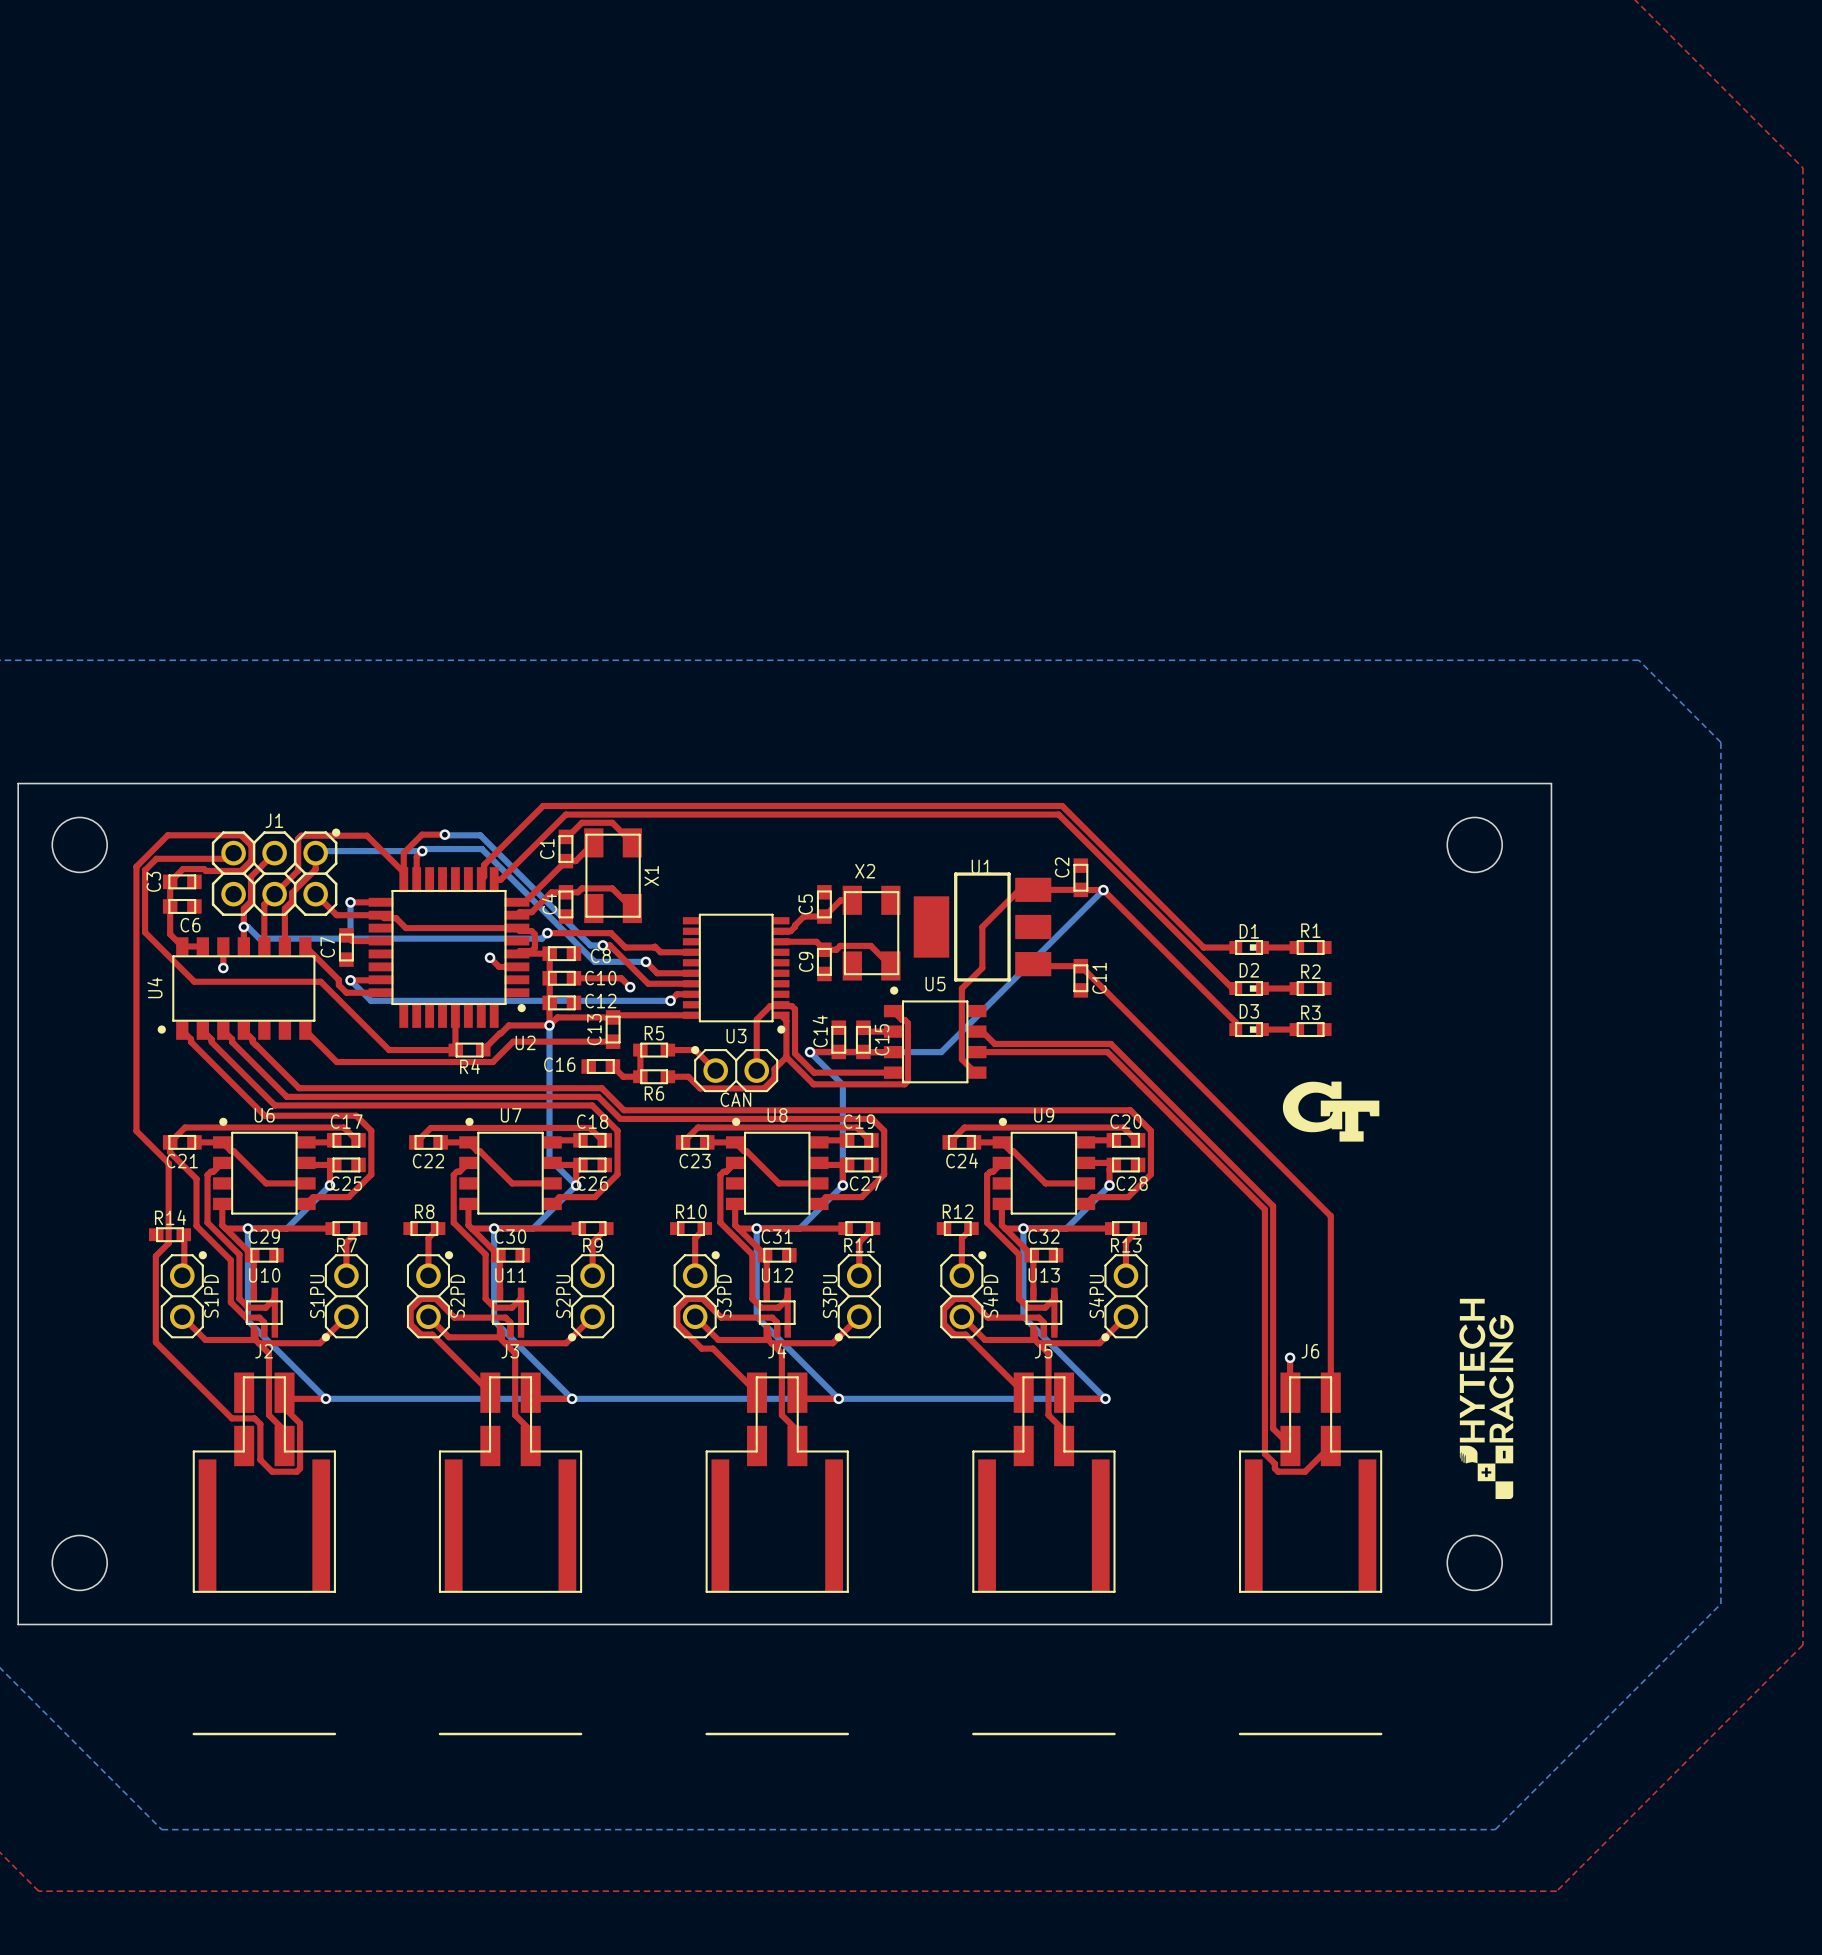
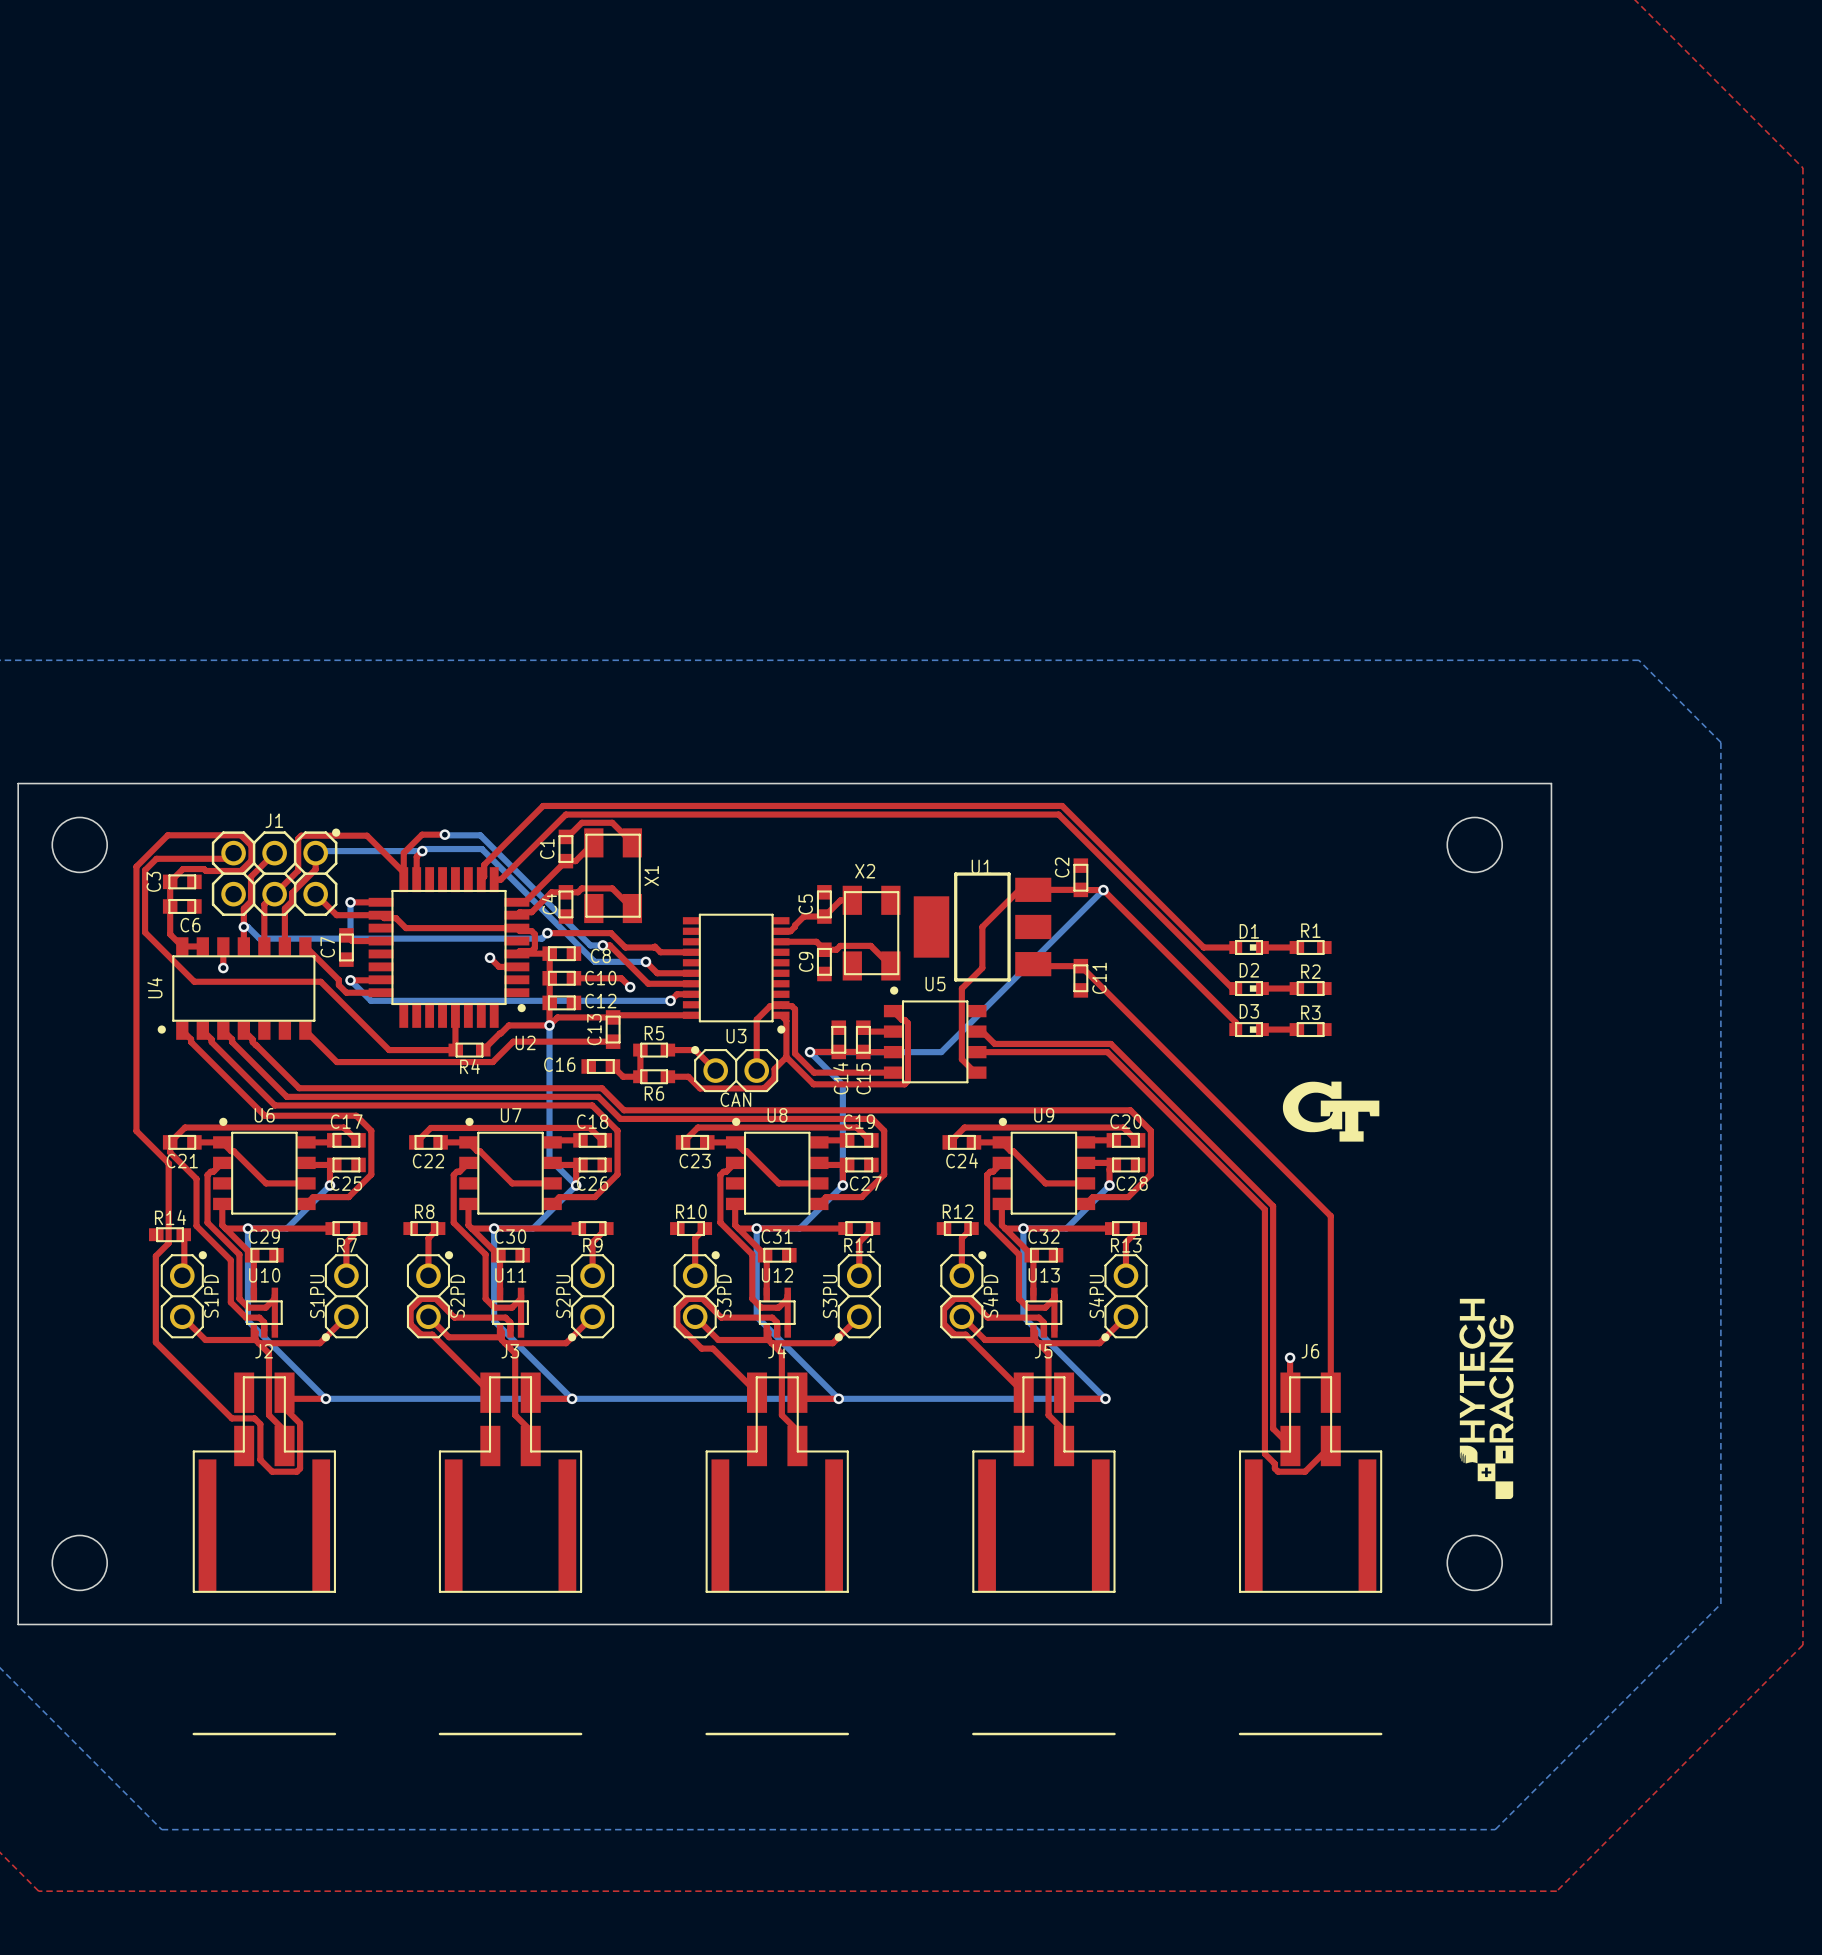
C14 name position: C14 (820, 1031) -> C14 (840, 1078)
C15 name position: C15 (882, 1039) -> C15 (863, 1078)

